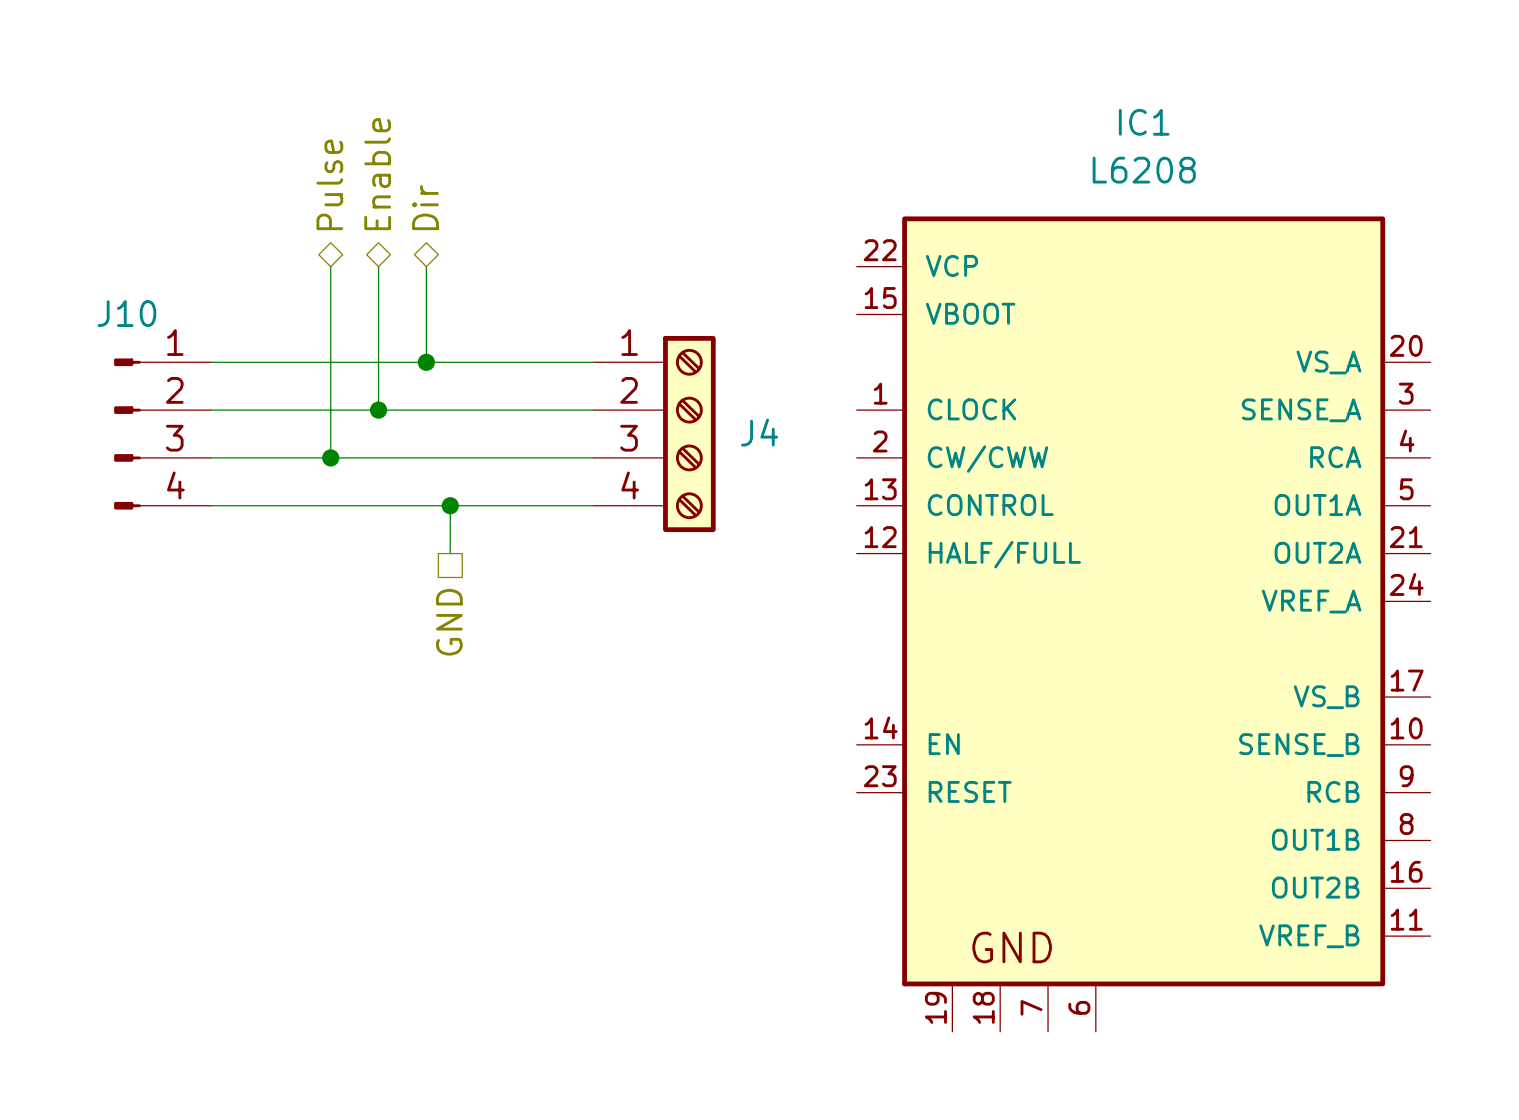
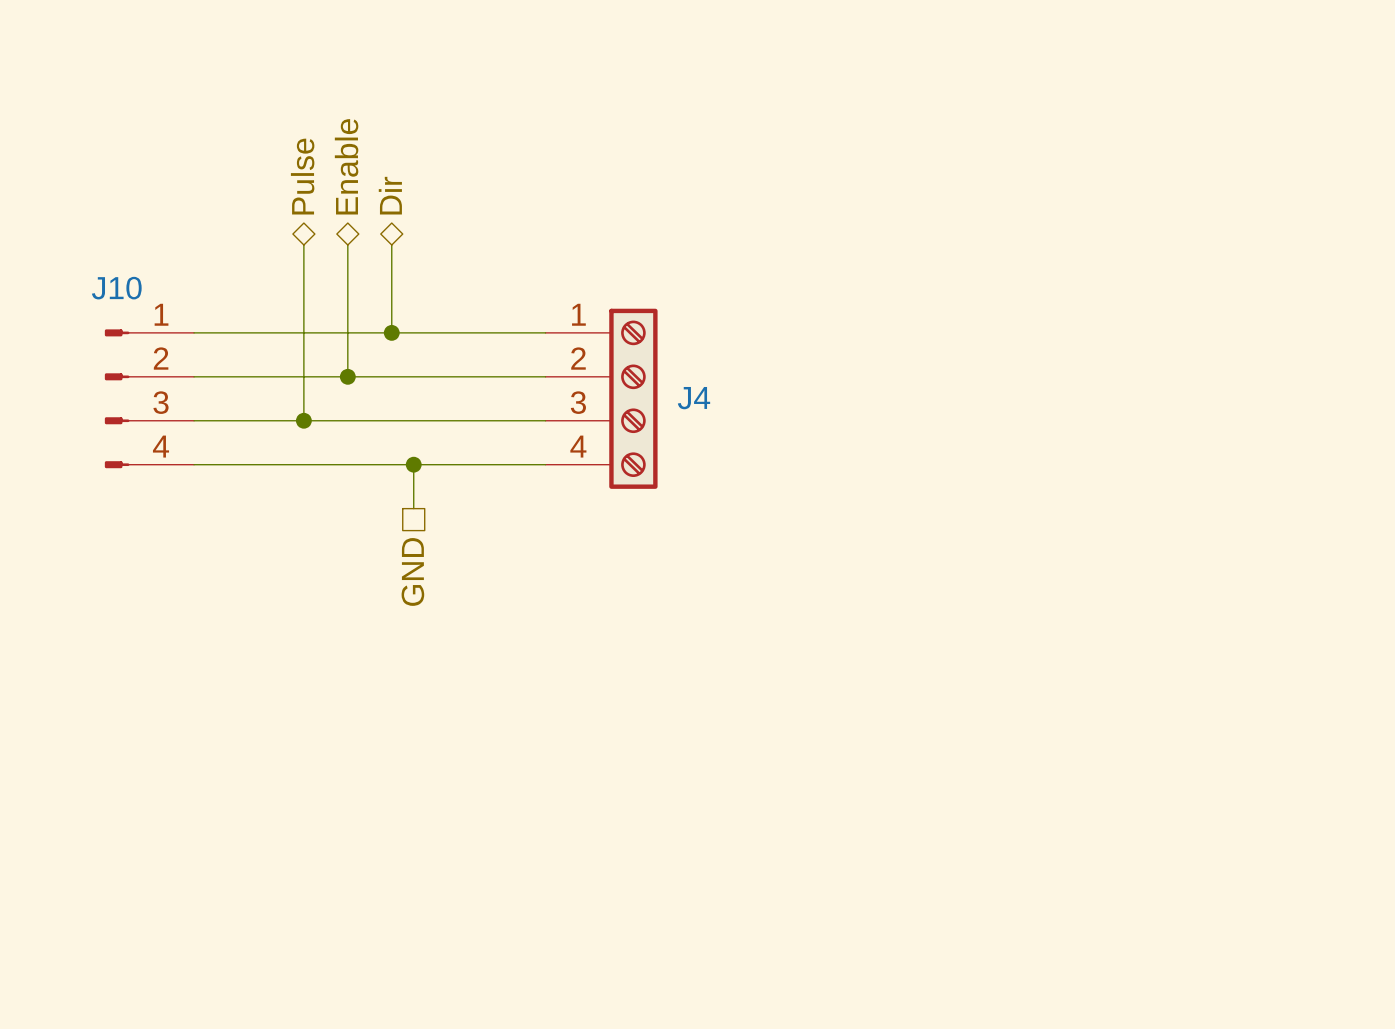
IC1: L6208 (1143, 624) -> none

